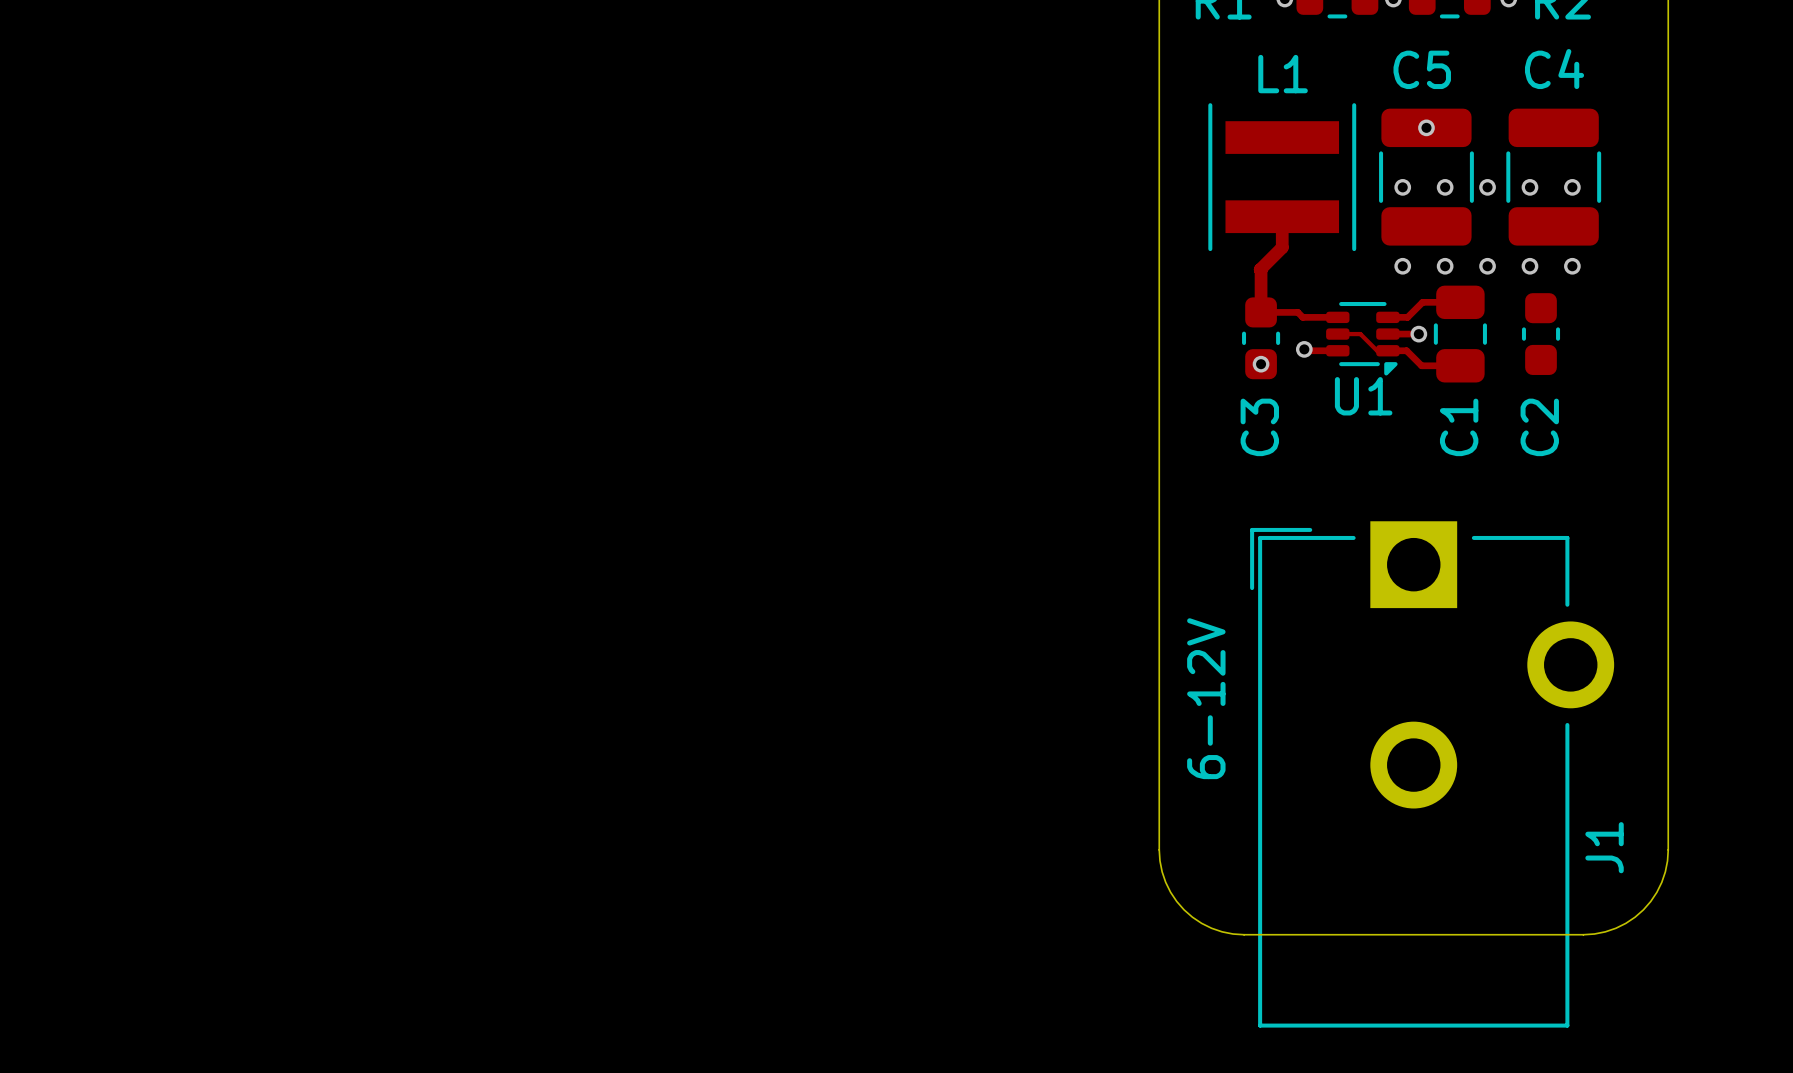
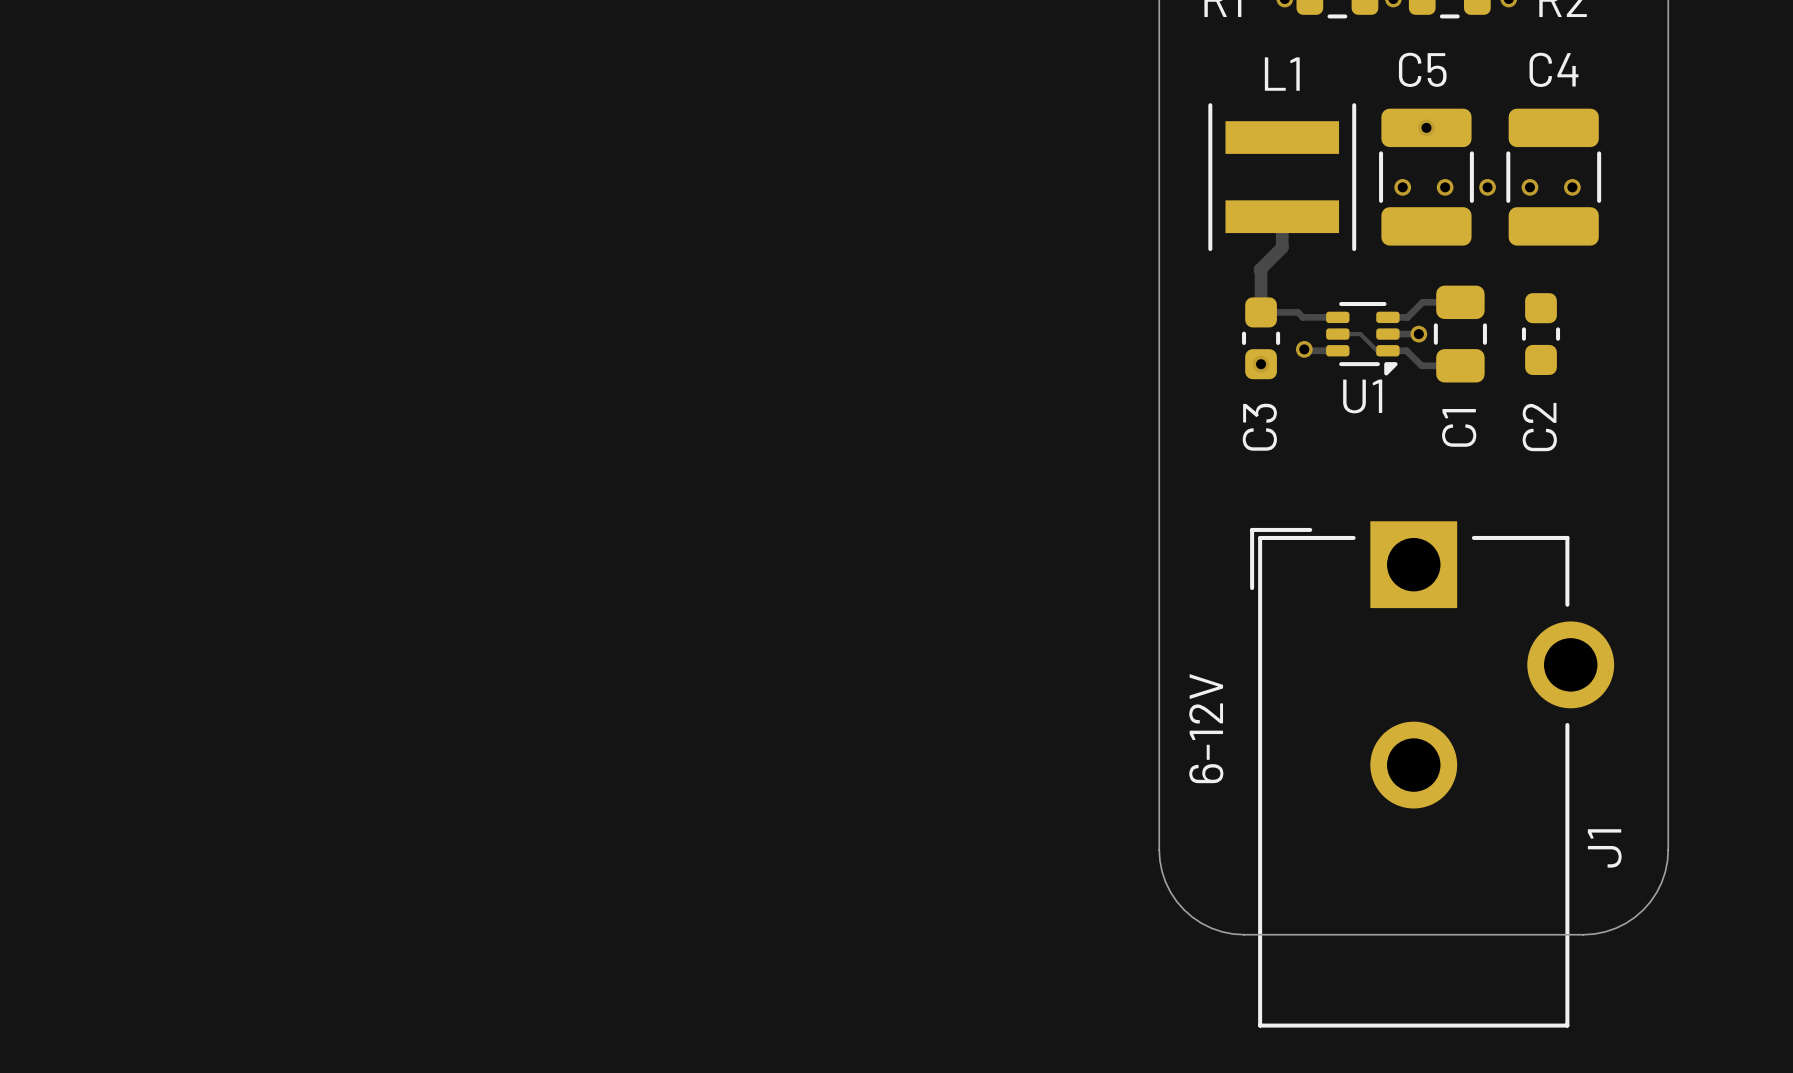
via: (1402, 266) -> none
via: (1445, 266) -> none
via: (1487, 266) -> none
via: (1529, 266) -> none
via: (1572, 266) -> none

